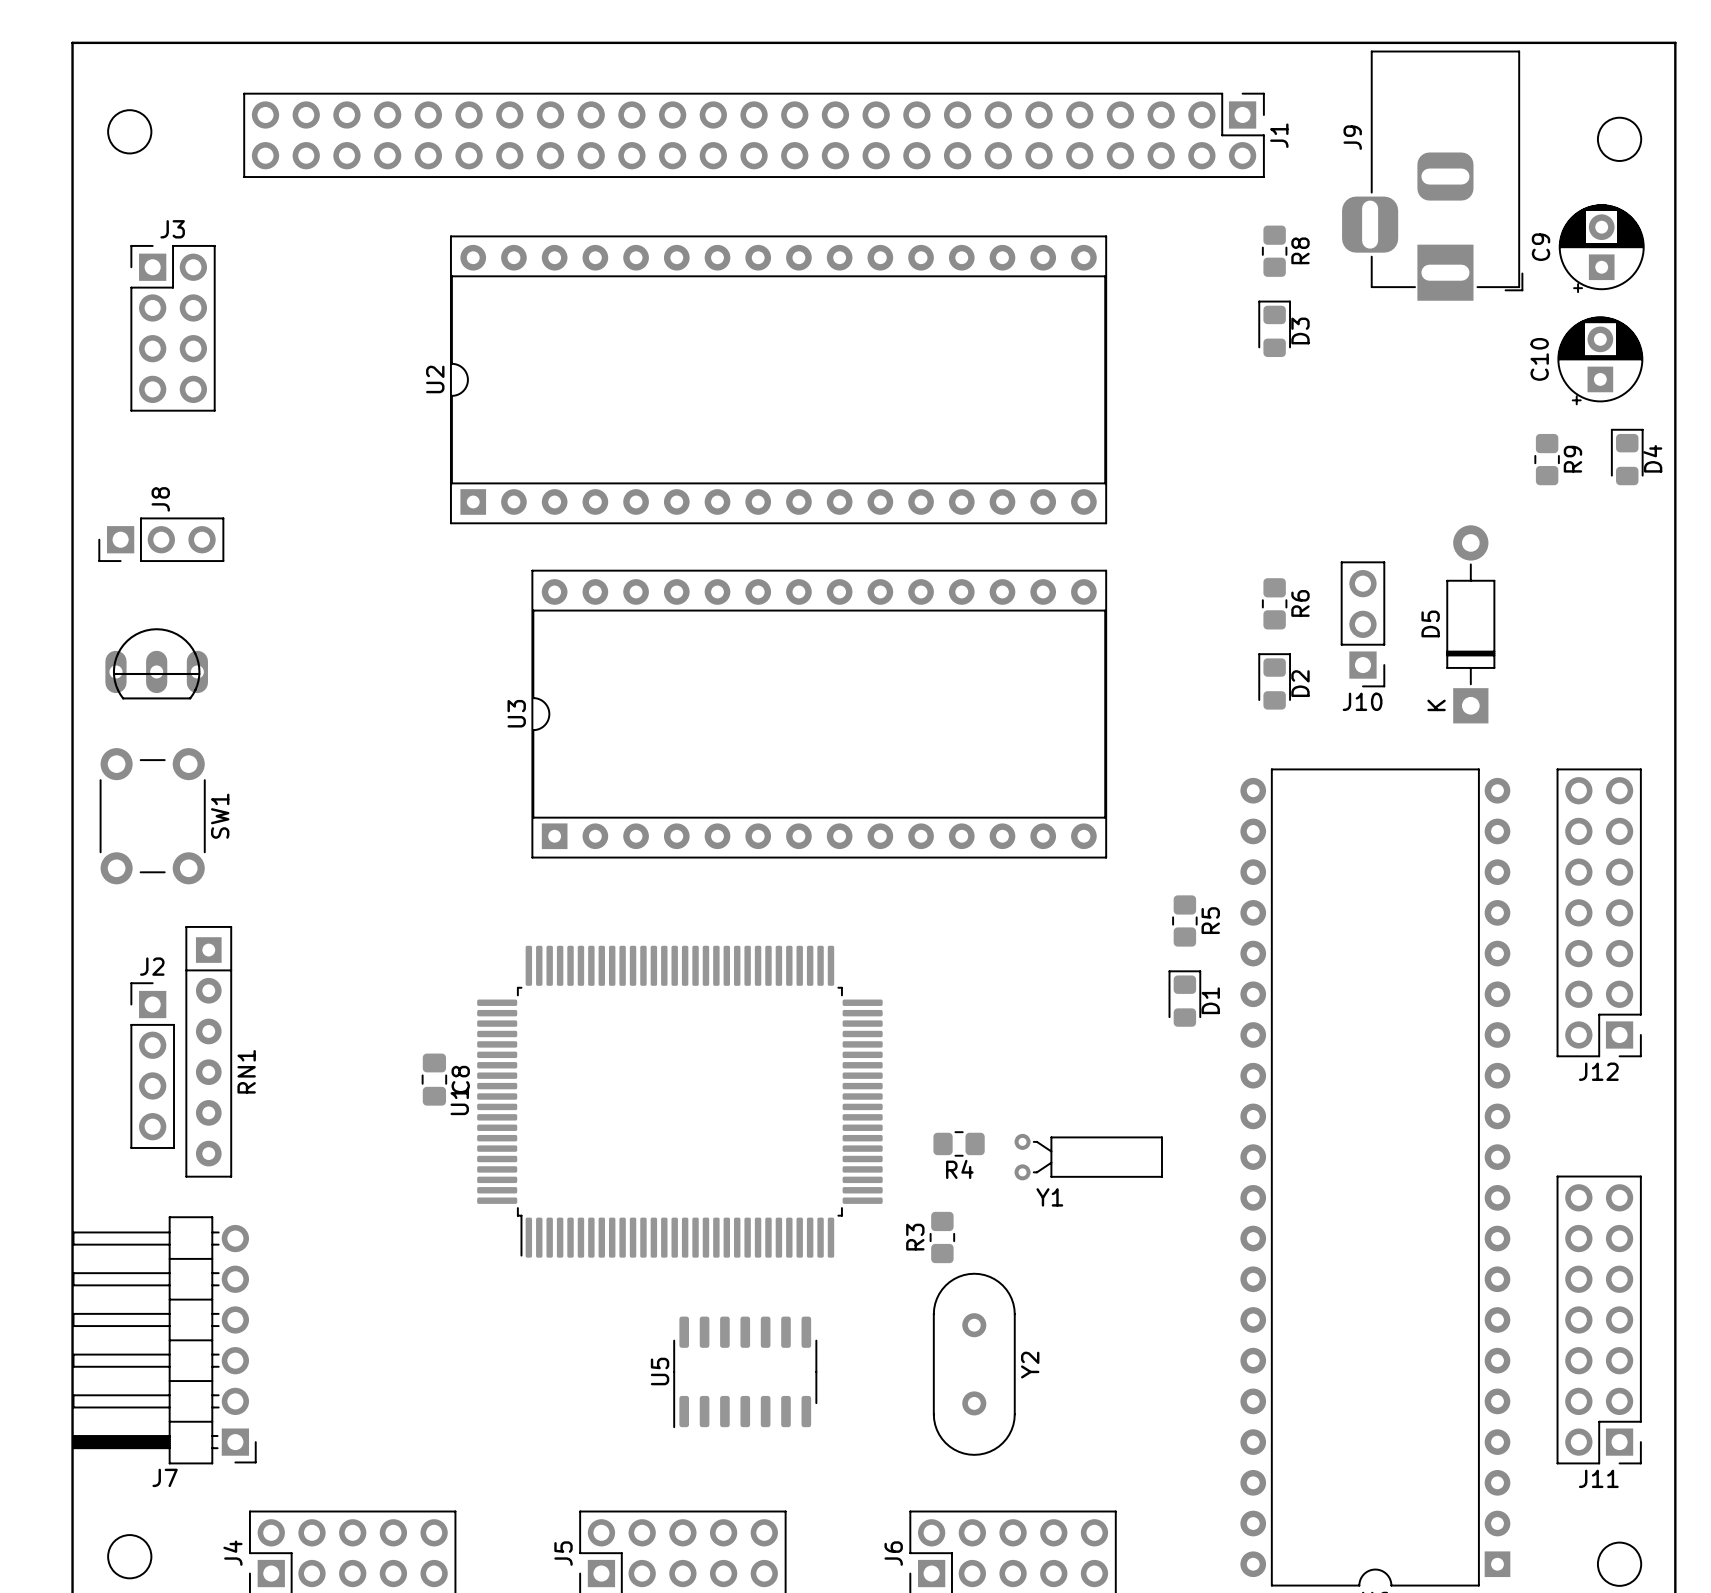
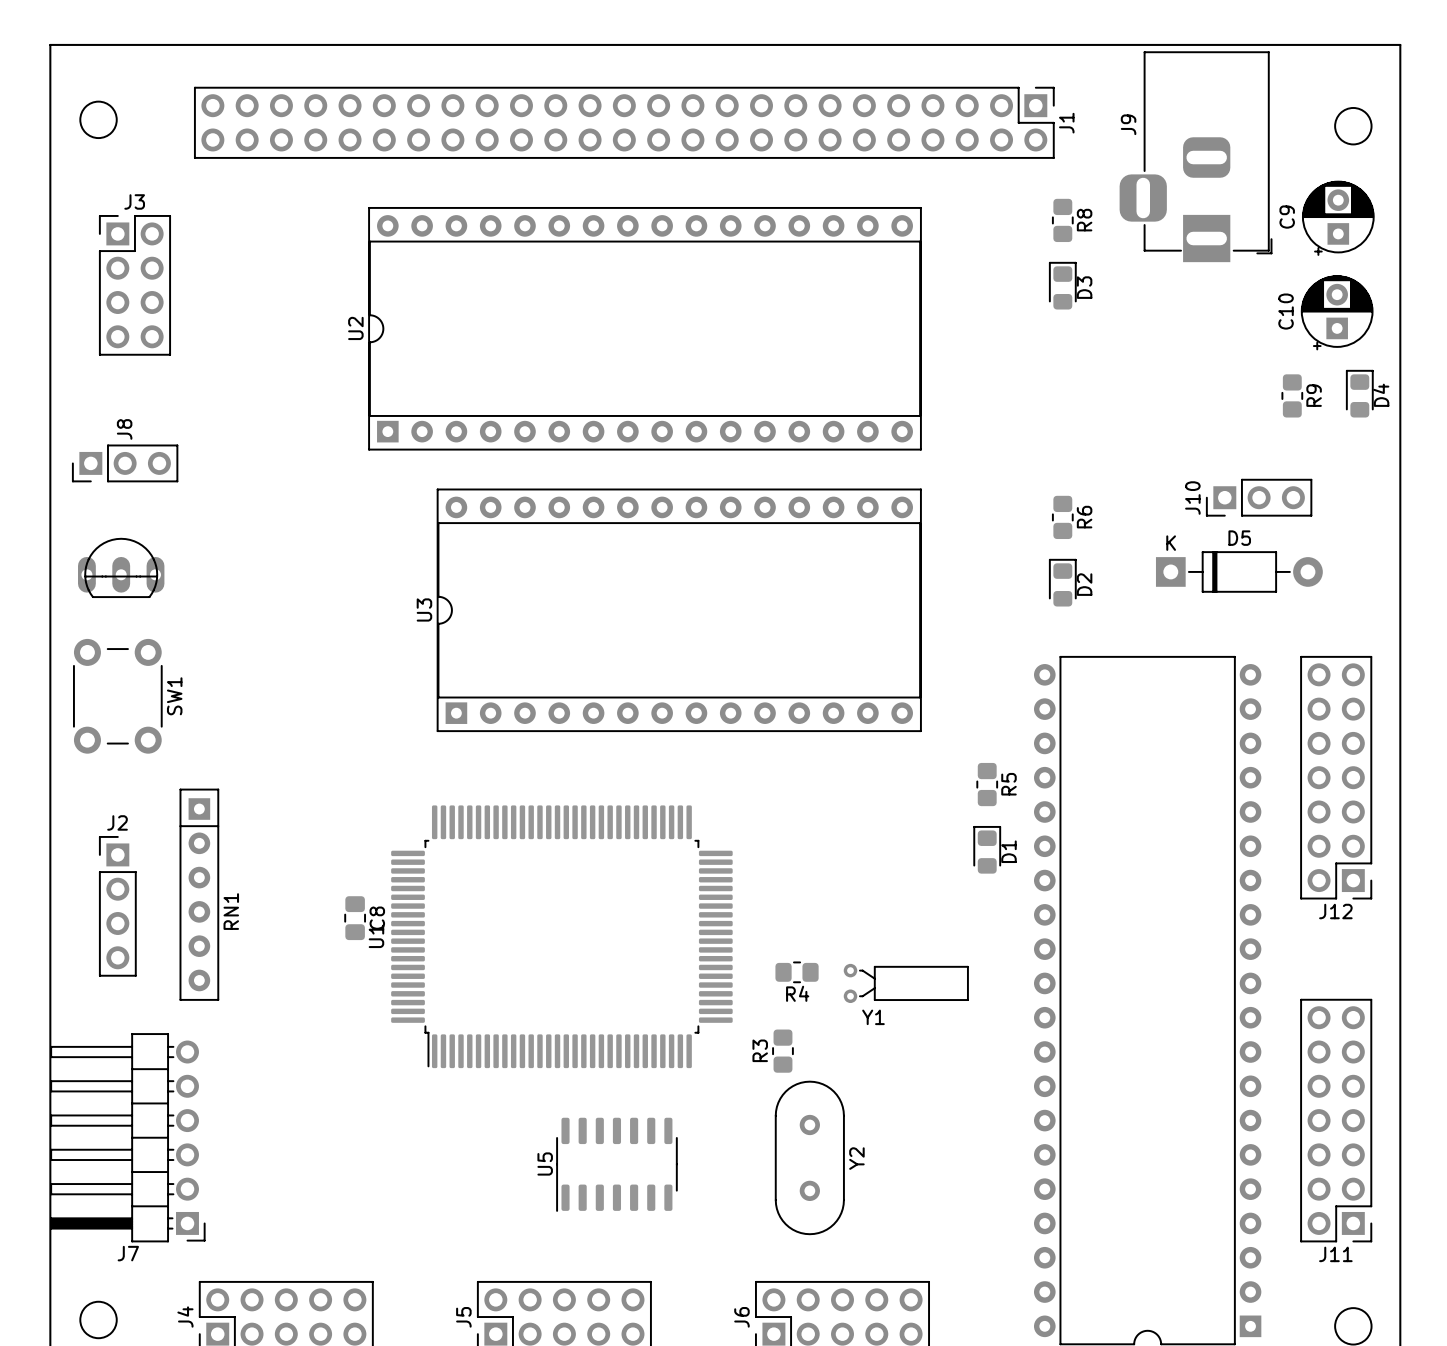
J10 rotation: 0° (1362, 624) -> 90° clockwise (1259, 497)
J10 position: (1362, 624) -> (1259, 497)
D5 rotation: 0° (1470, 624) -> 90° clockwise (1239, 571)
RN1 position: (208, 1051) -> (199, 894)

